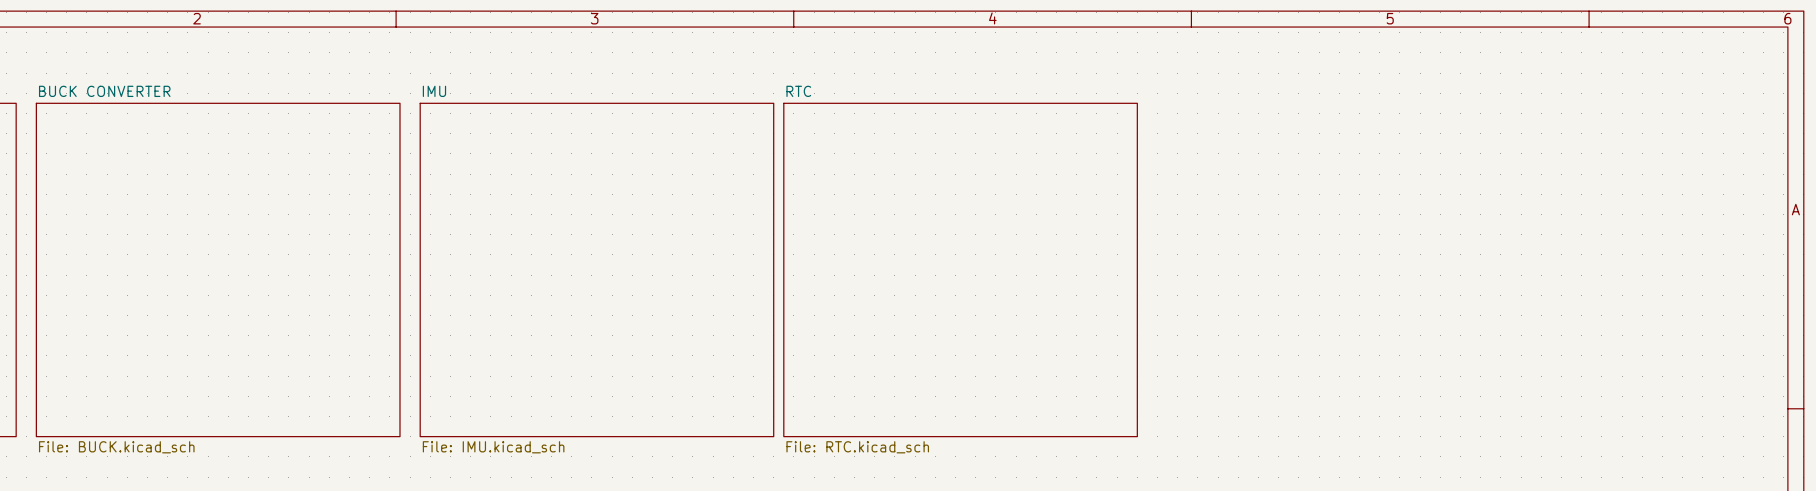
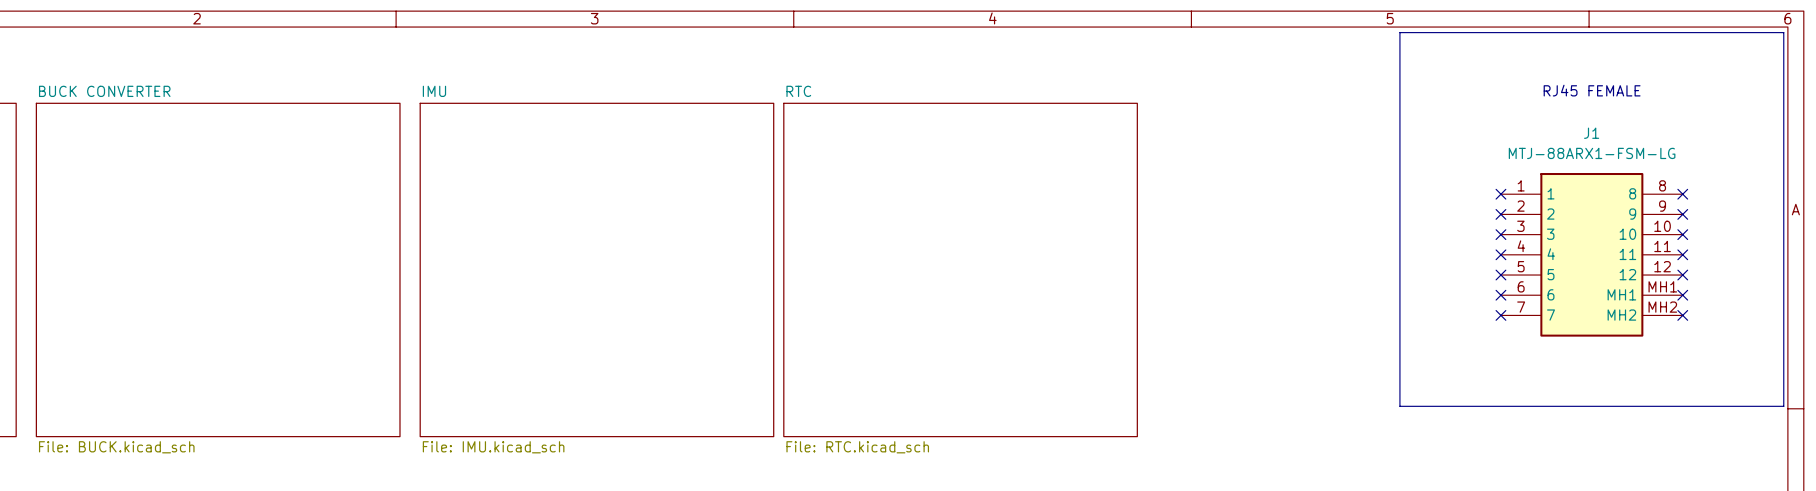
line: none -> (1399, 32) (1783, 32) (1783, 406) (1399, 406) (1399, 32)
text: none -> RJ45 FEMALE (1592, 90)
no-connect mark: none -> (1500, 194)
no-connect mark: none -> (1682, 194)
no-connect mark: none -> (1500, 214)
no-connect mark: none -> (1682, 214)
no-connect mark: none -> (1500, 234)
no-connect mark: none -> (1682, 234)
no-connect mark: none -> (1500, 254)
J1: none -> MTJ-88ARX1-FSM-LG (1591, 254)
no-connect mark: none -> (1682, 254)
no-connect mark: none -> (1500, 275)
no-connect mark: none -> (1682, 275)
no-connect mark: none -> (1500, 295)
no-connect mark: none -> (1682, 295)
no-connect mark: none -> (1500, 315)
no-connect mark: none -> (1682, 315)

